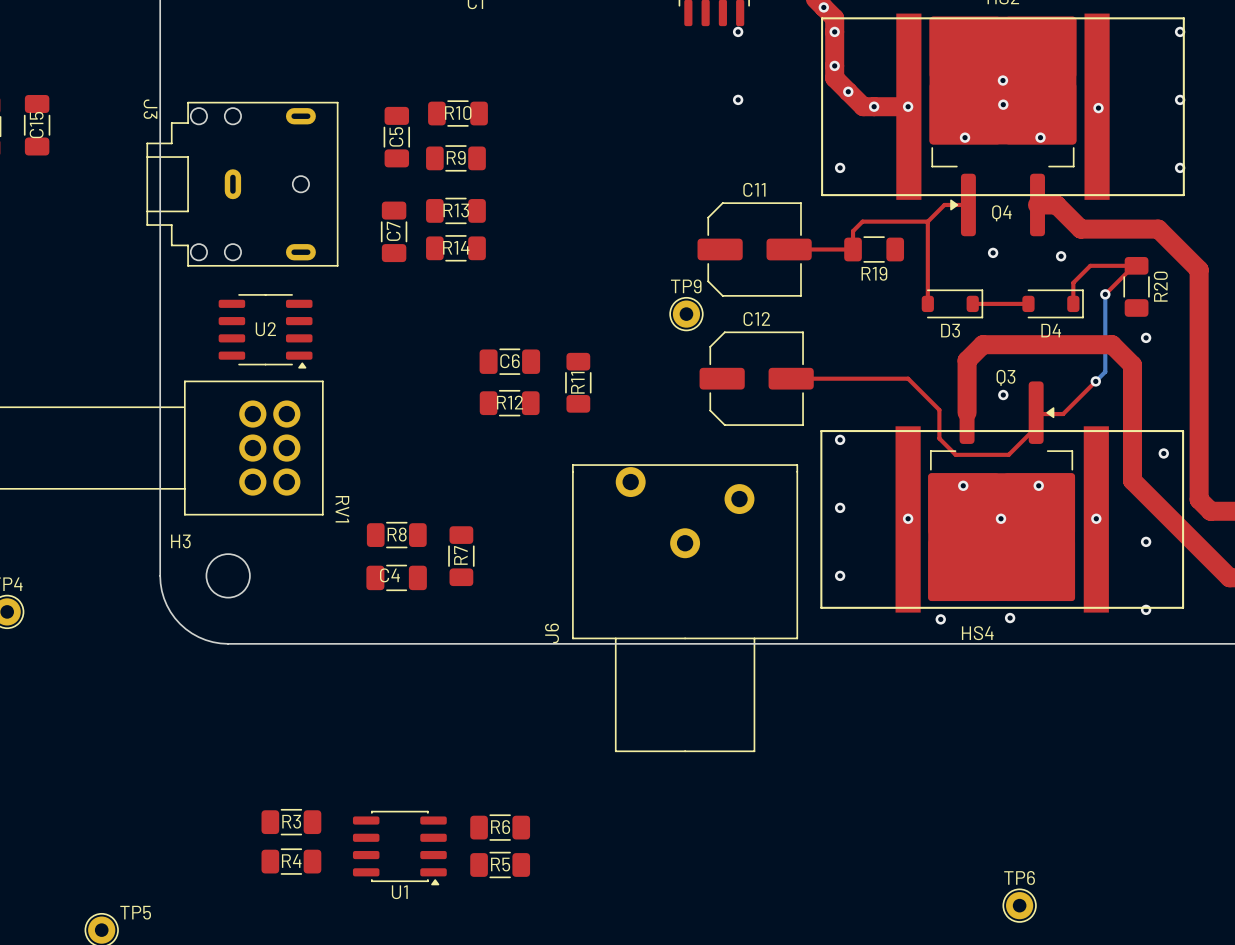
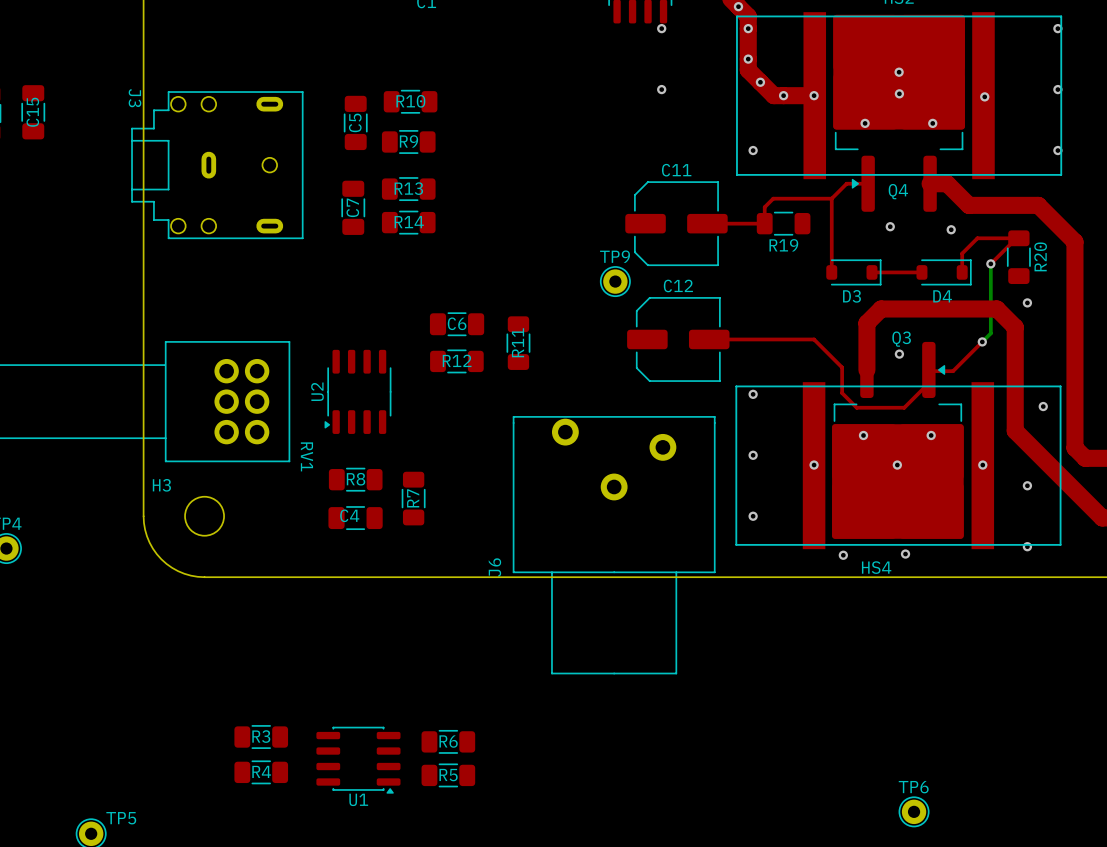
U2 name position: U2 (265, 329) -> U2 (317, 391)
U2 rotation: 0° (265, 331) -> 90° clockwise (357, 391)
U2 position: (265, 331) -> (357, 391)

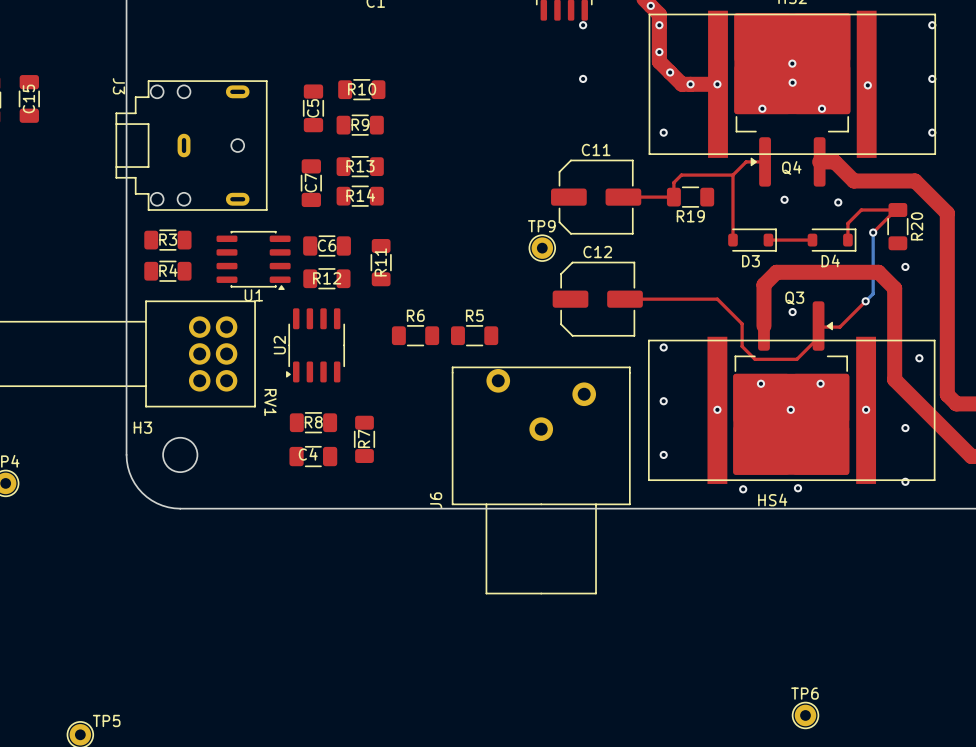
C6 position: (457, 324) -> (327, 245)
R11 position: (518, 343) -> (381, 262)
R12 position: (456, 361) -> (326, 278)
R3 position: (261, 737) -> (167, 240)
R6 position: (448, 741) -> (415, 335)
R6 name position: R6 (448, 741) -> R6 (415, 315)
U1 position: (358, 760) -> (253, 260)
R4 position: (261, 772) -> (167, 271)
R5 position: (448, 775) -> (474, 335)
R5 name position: R5 (448, 775) -> R5 (474, 315)

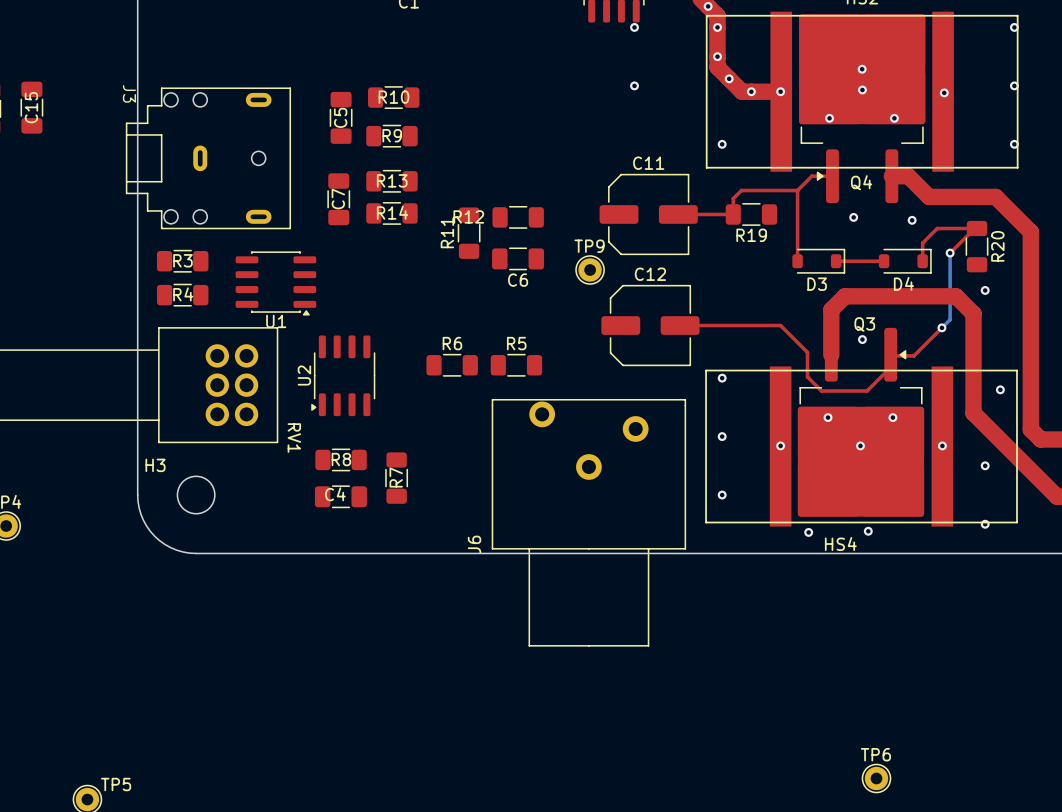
C6 position: (327, 245) -> (518, 258)
C6 name position: C6 (327, 245) -> C6 (518, 280)
R11 name position: R11 (380, 262) -> R11 (447, 232)
R11 position: (381, 262) -> (469, 233)
R12 position: (326, 278) -> (518, 217)
R12 name position: R12 (327, 278) -> R12 (468, 216)

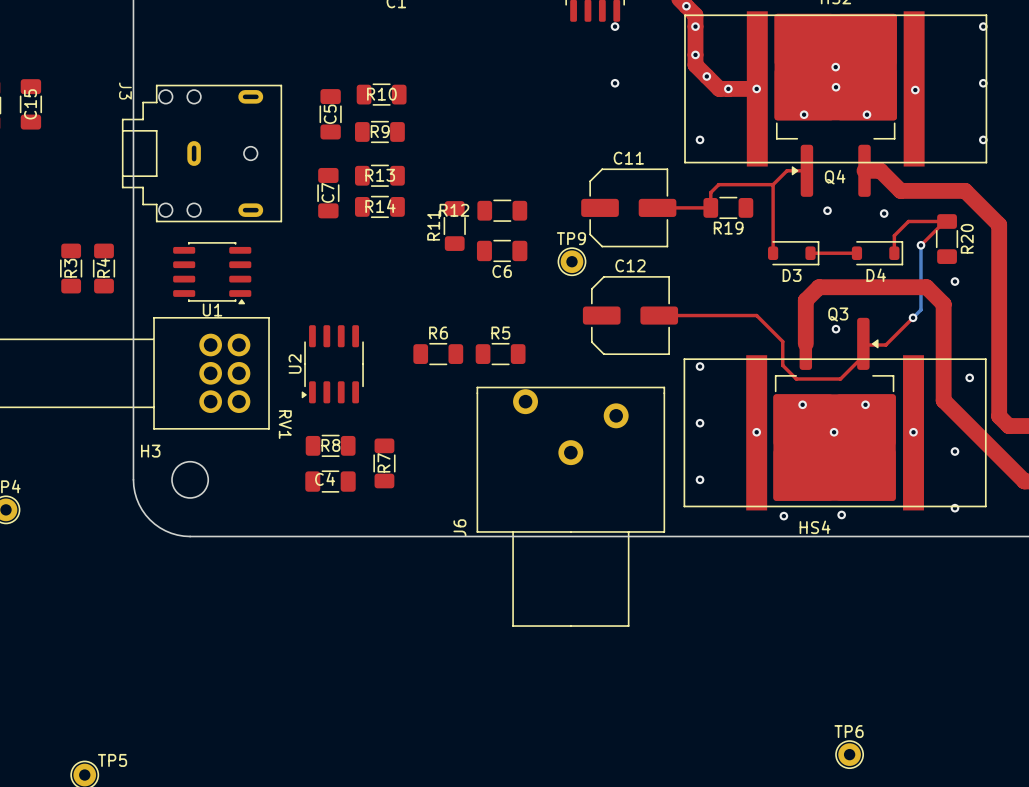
R3 rotation: 0° (182, 261) -> 90° clockwise (71, 268)
R3 position: (182, 261) -> (71, 268)
U1 position: (275, 283) -> (212, 273)
R4 rotation: 0° (182, 295) -> 90° clockwise (104, 268)
R4 position: (182, 295) -> (104, 268)

